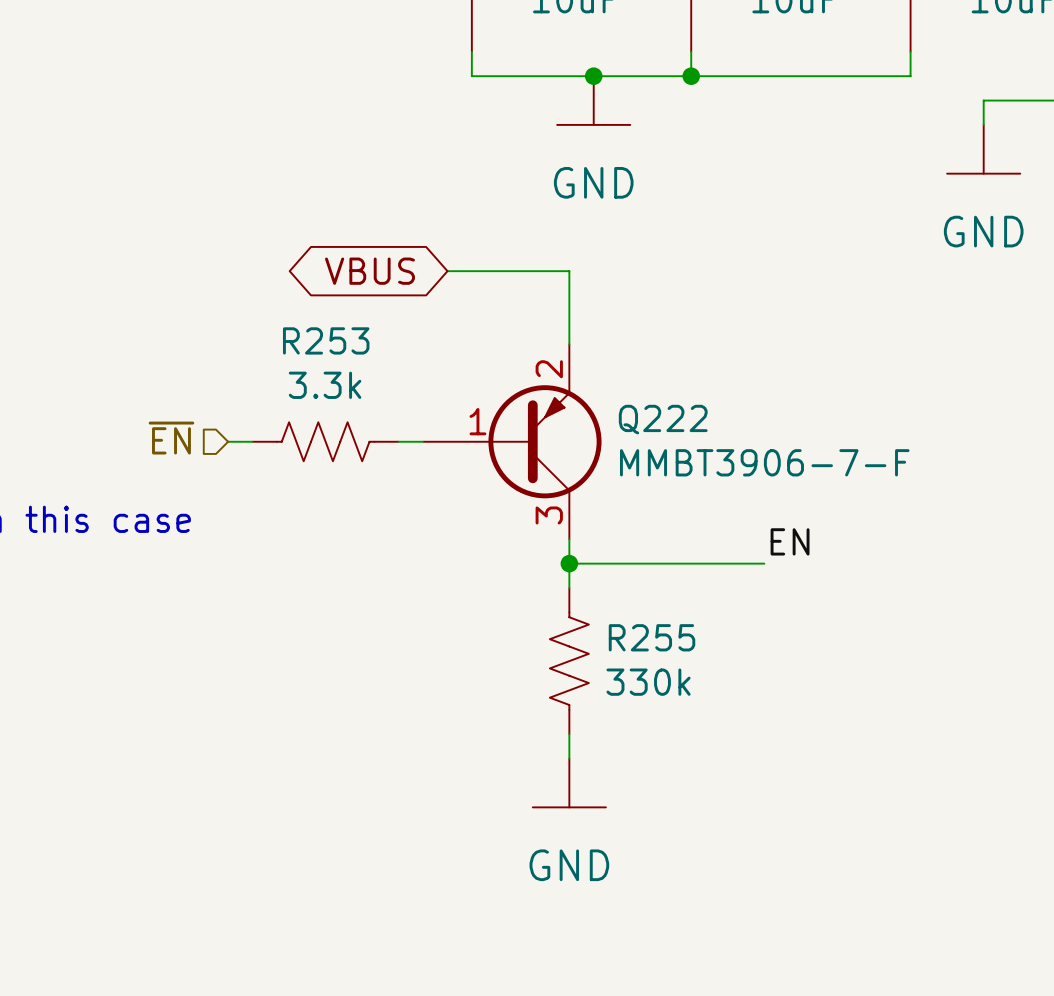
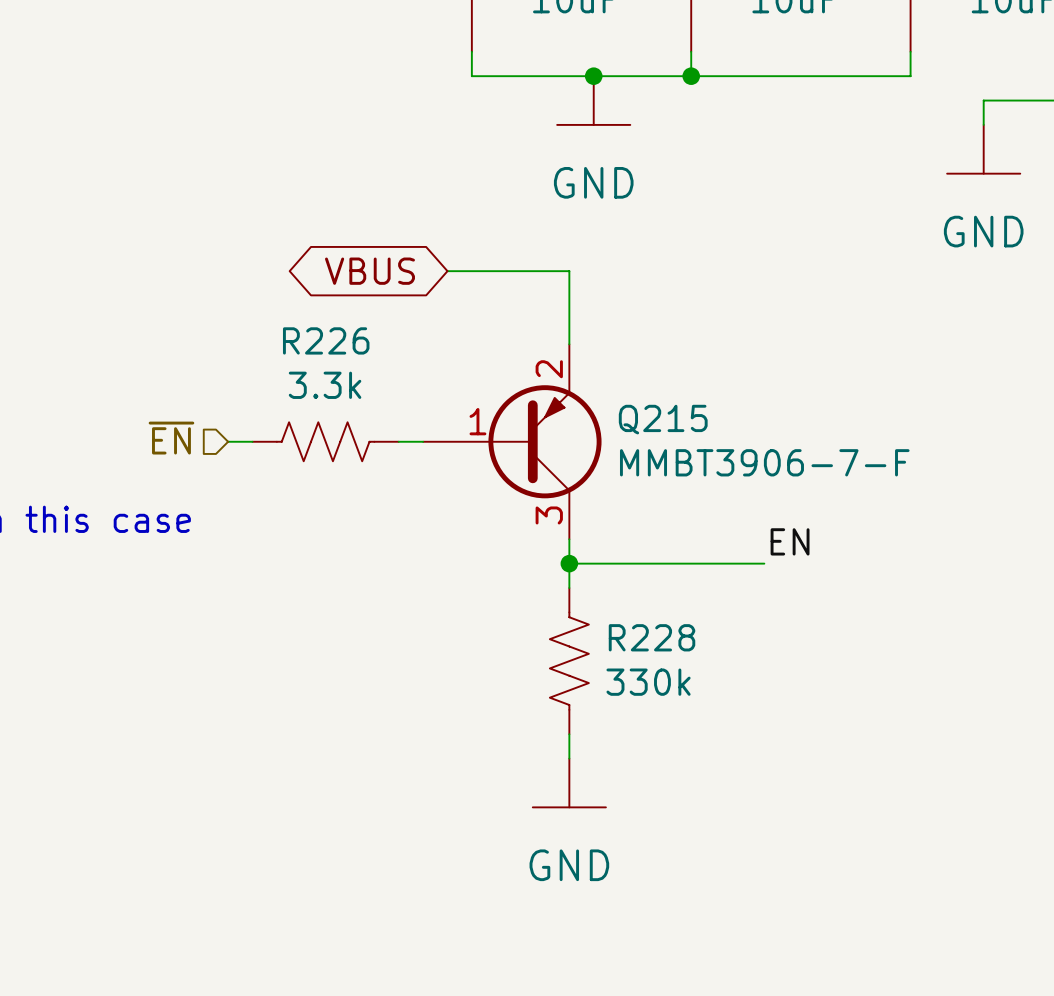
R253 name: R253 (326, 340) -> R226 (326, 340)
Q222 name: Q222 (663, 419) -> Q215 (663, 419)
R255 name: R255 (652, 637) -> R228 (652, 637)

